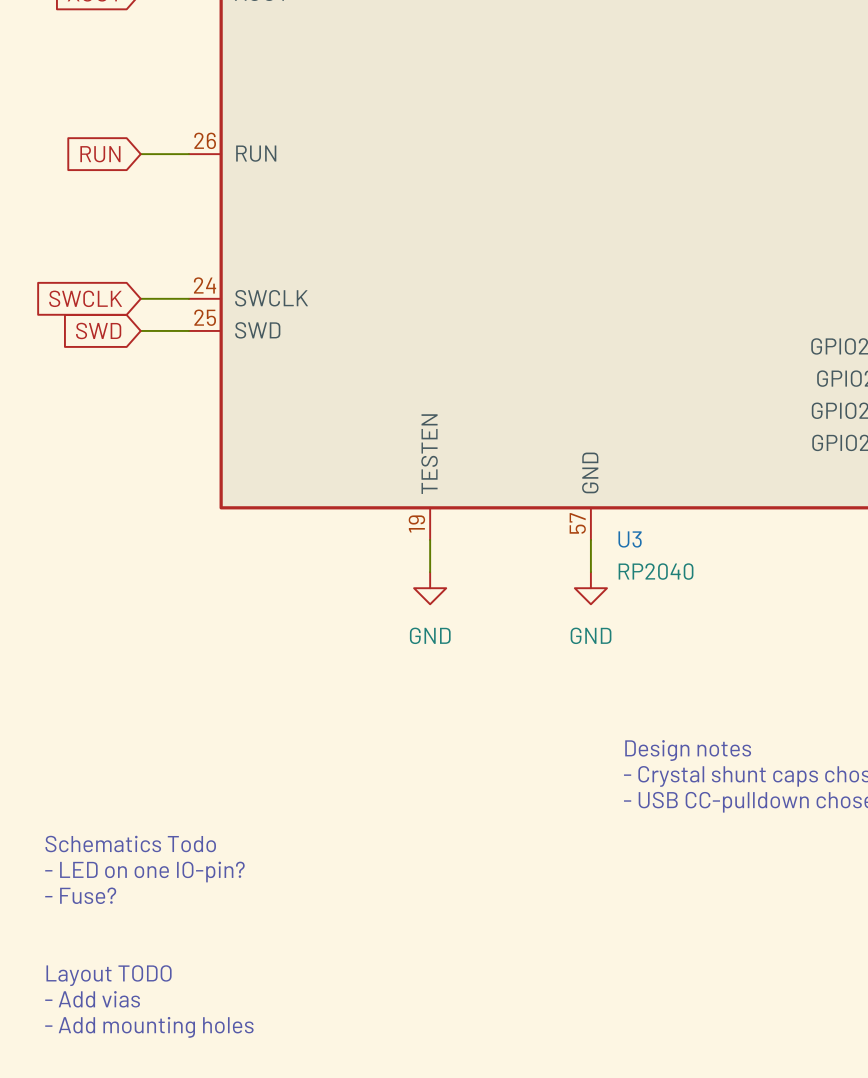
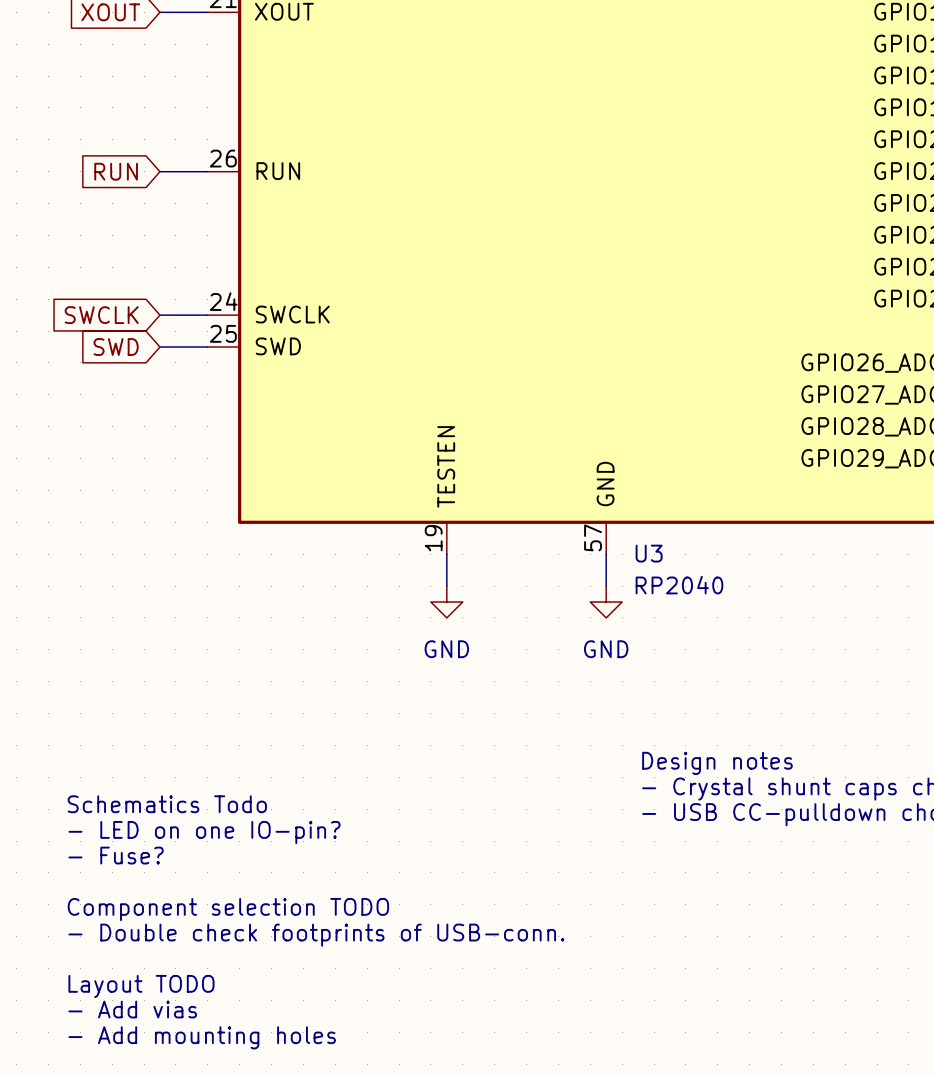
text: none -> Schematics Todo (167, 804)
text: Schematics Todo (130, 844) -> - Fuse? (116, 855)
text position: - LED on one IO-pin? (144, 872) -> - LED on one IO-pin? (204, 832)
text: - Fuse? (80, 895) -> Component selection TODO (228, 909)
text: none -> - Double check footprints of USB-conn. (316, 935)

